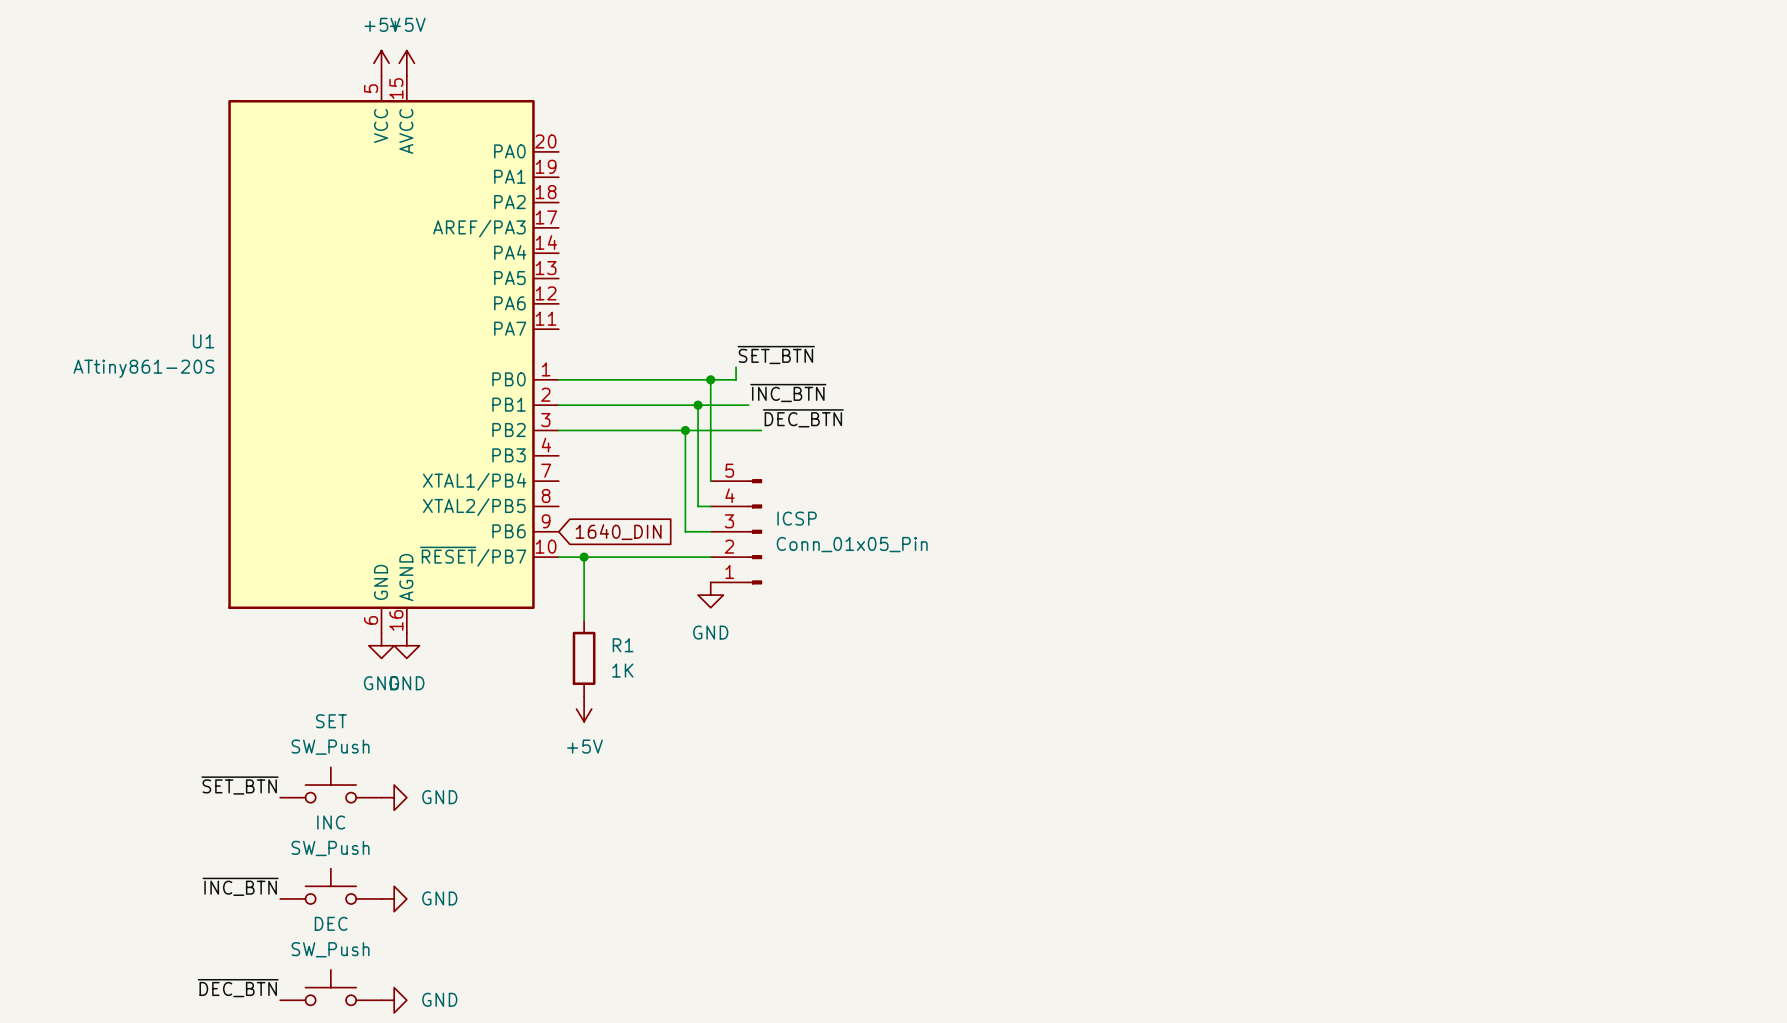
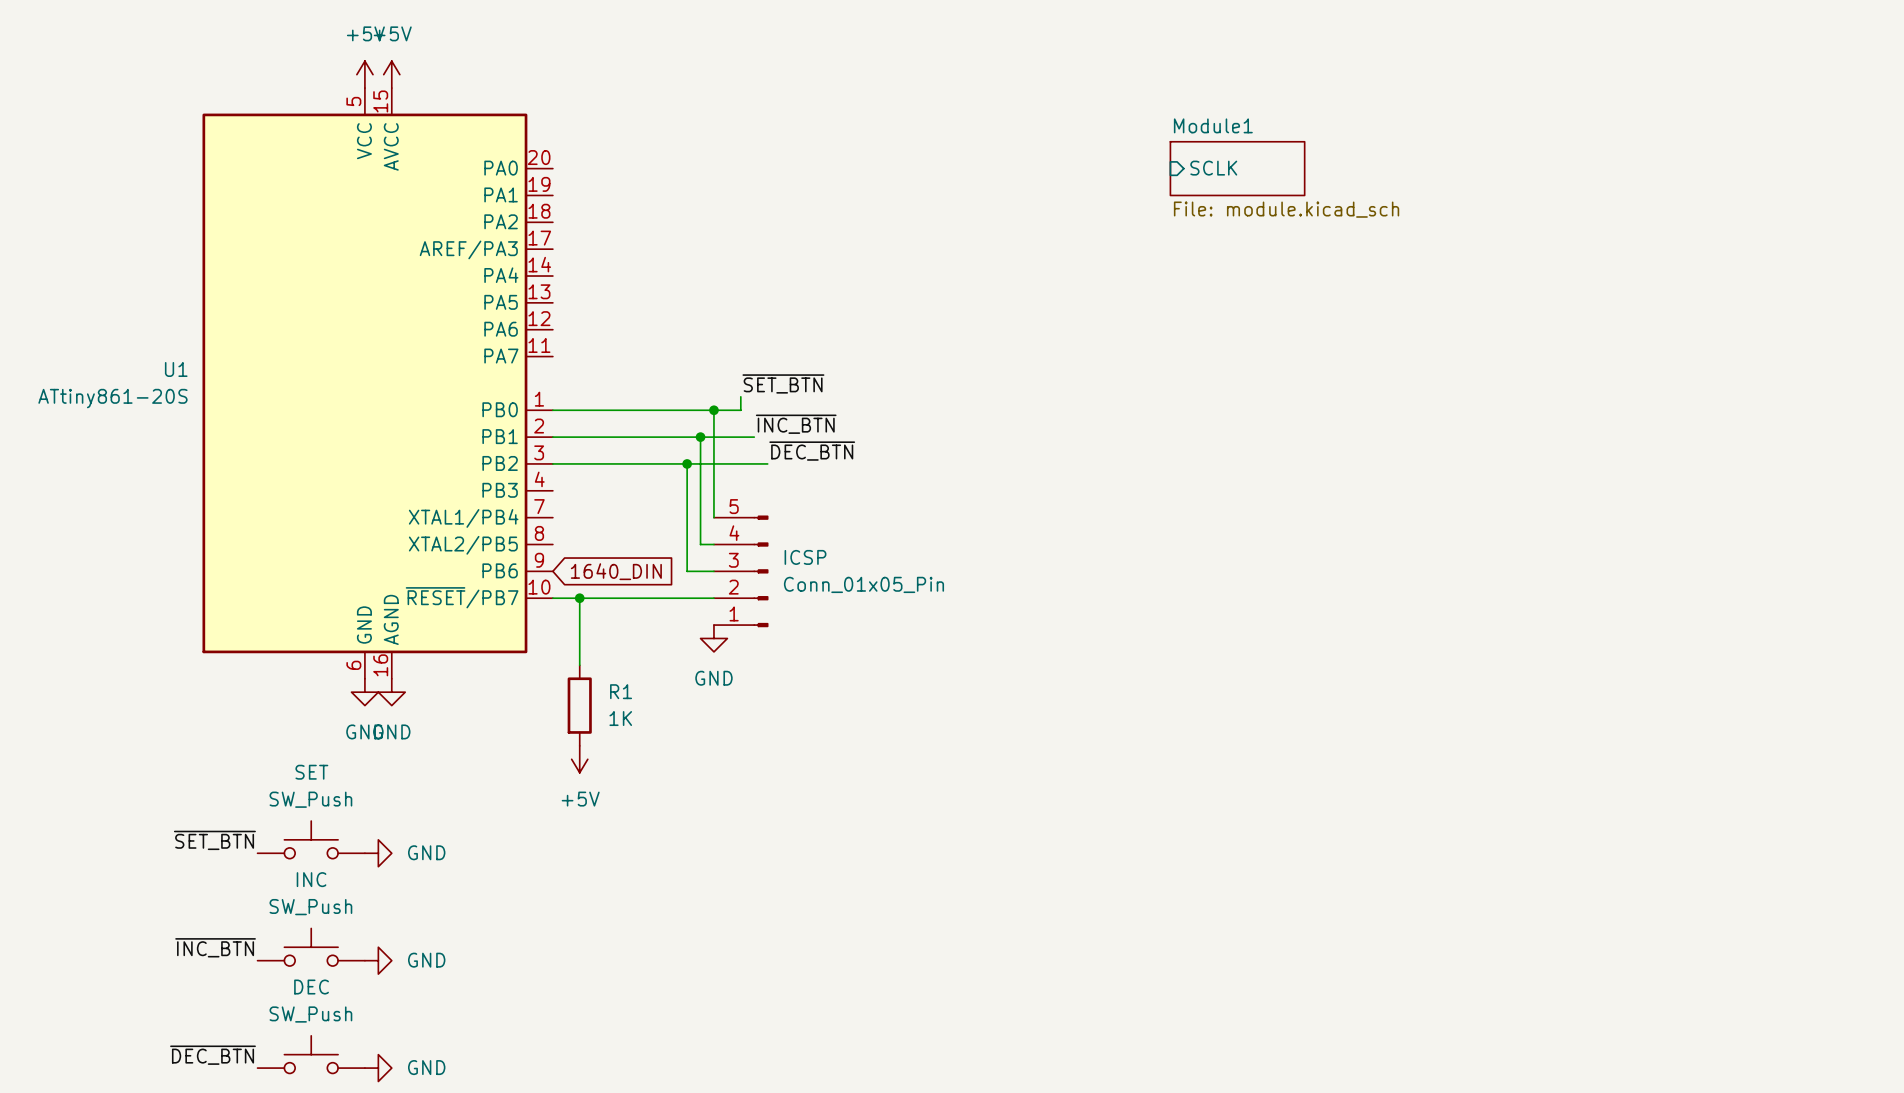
sheet pin: none -> SCLK (1213, 168)
sheet Module1: none -> File: module.kicad_sch (1237, 168)

